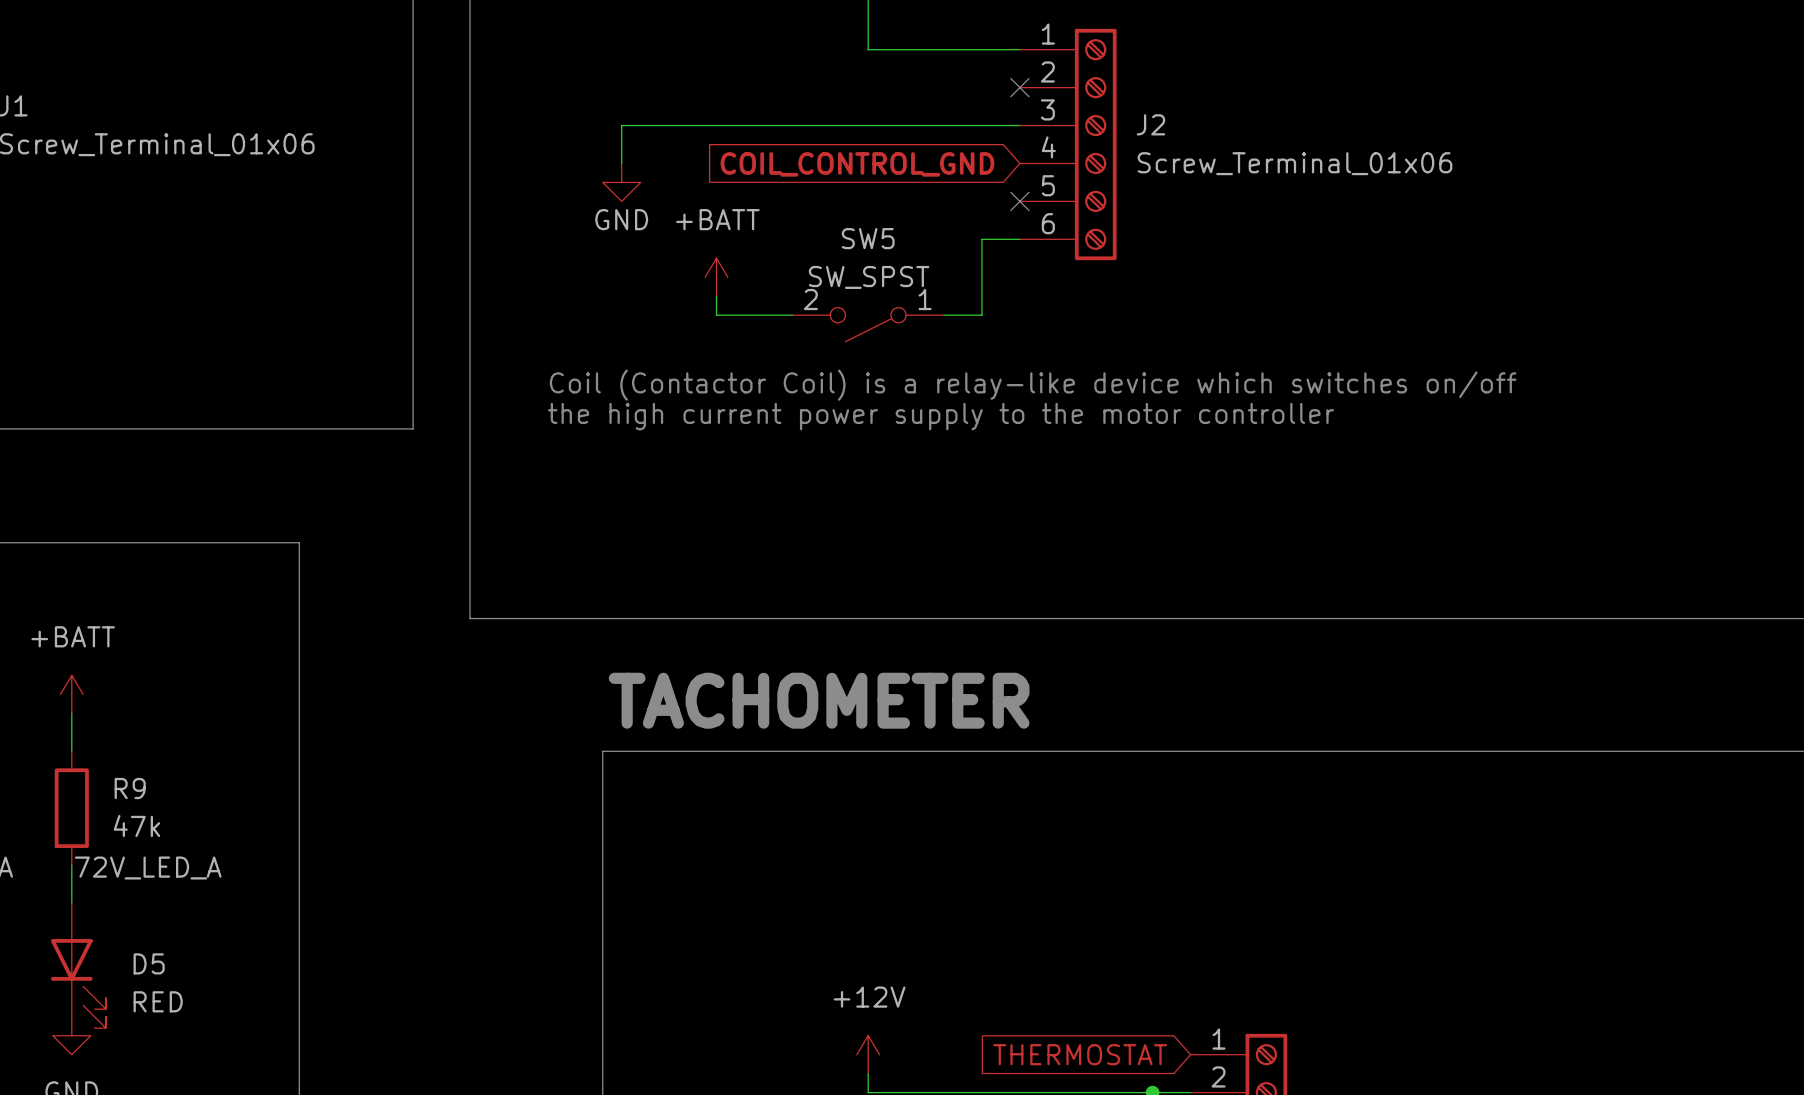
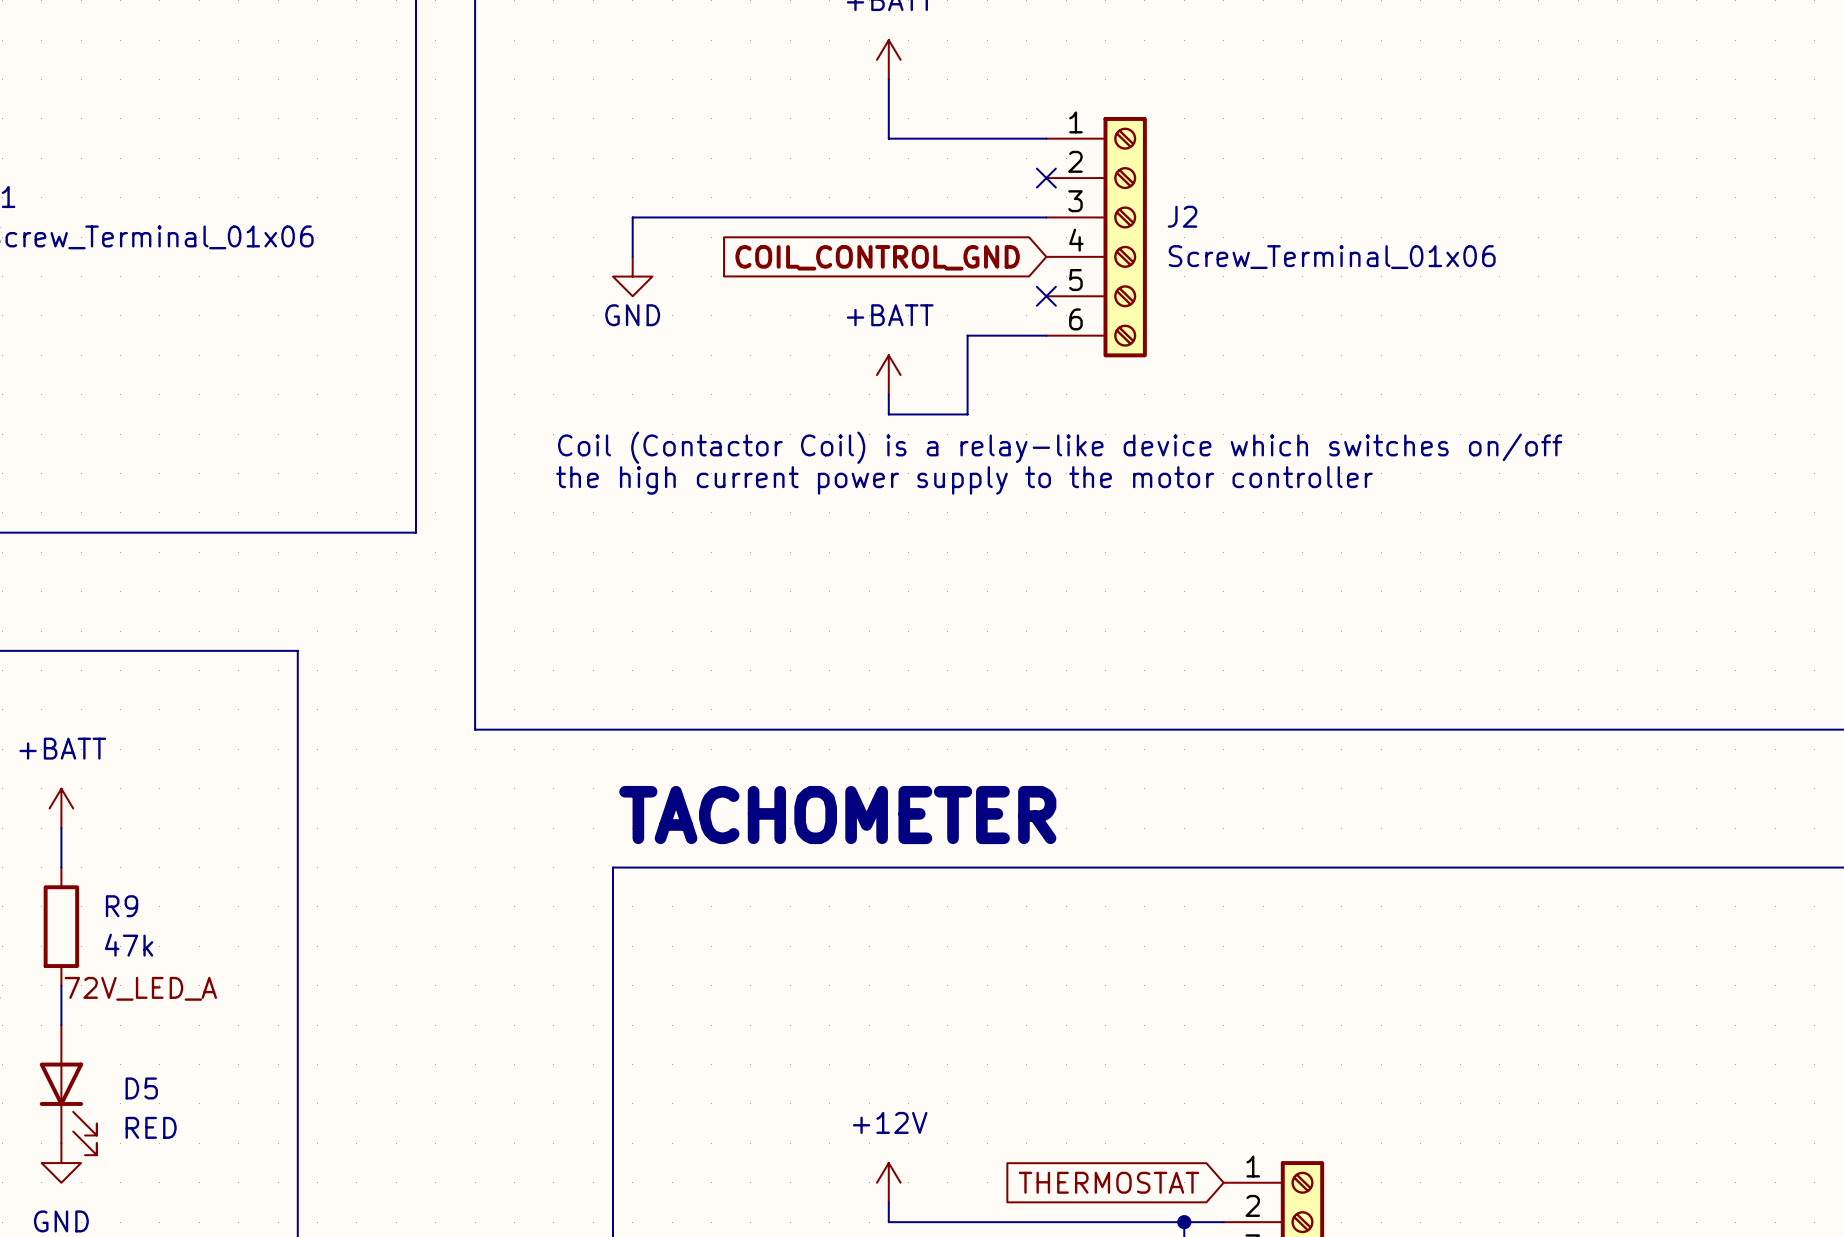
wire: (981, 239) (981, 315) (944, 315) -> (1006, 335) (967, 335) (967, 414) (888, 414) (888, 394)
power symbol position: +BATT (716, 277) -> +BATT (888, 375)
wire: (716, 296) (716, 315) (792, 315) -> none
SW5: SW_SPST (868, 324) -> none
text position: Coil (Contactor Coil) is a relay-like device which switches on/off (1033, 385) -> Coil (Contactor Coil) is a relay-like device which switches on/off (1060, 447)
text position: the high current power supply to the motor controller (941, 416) -> the high current power supply to the motor controller (964, 480)

